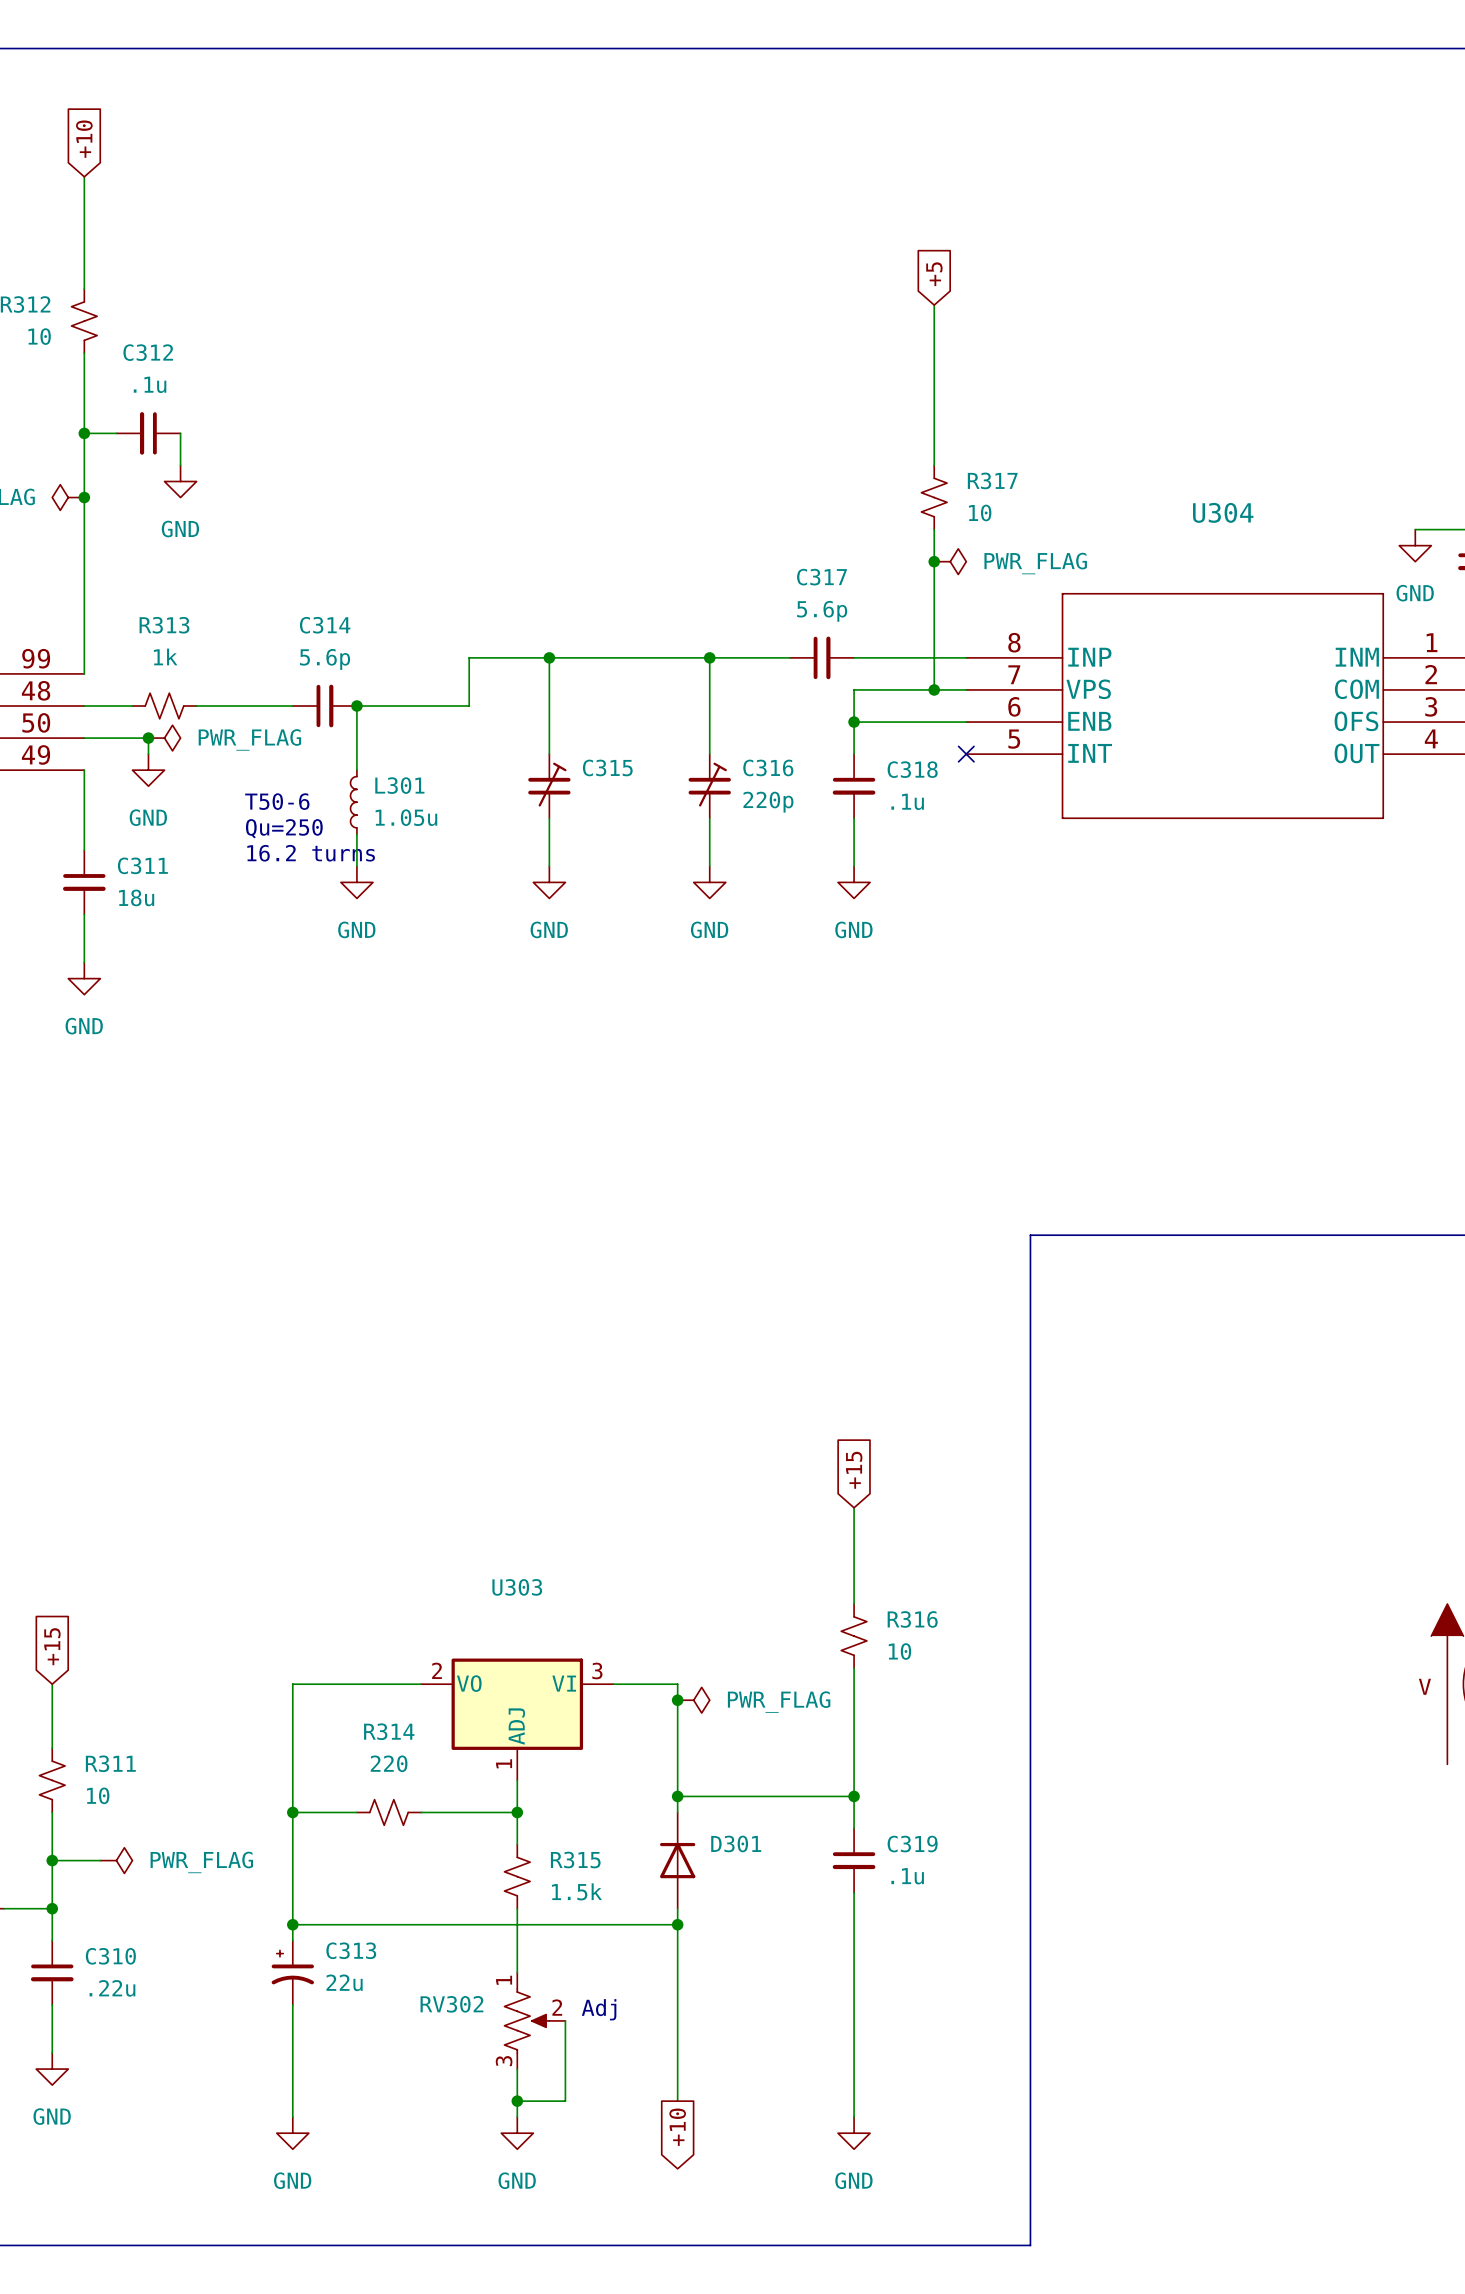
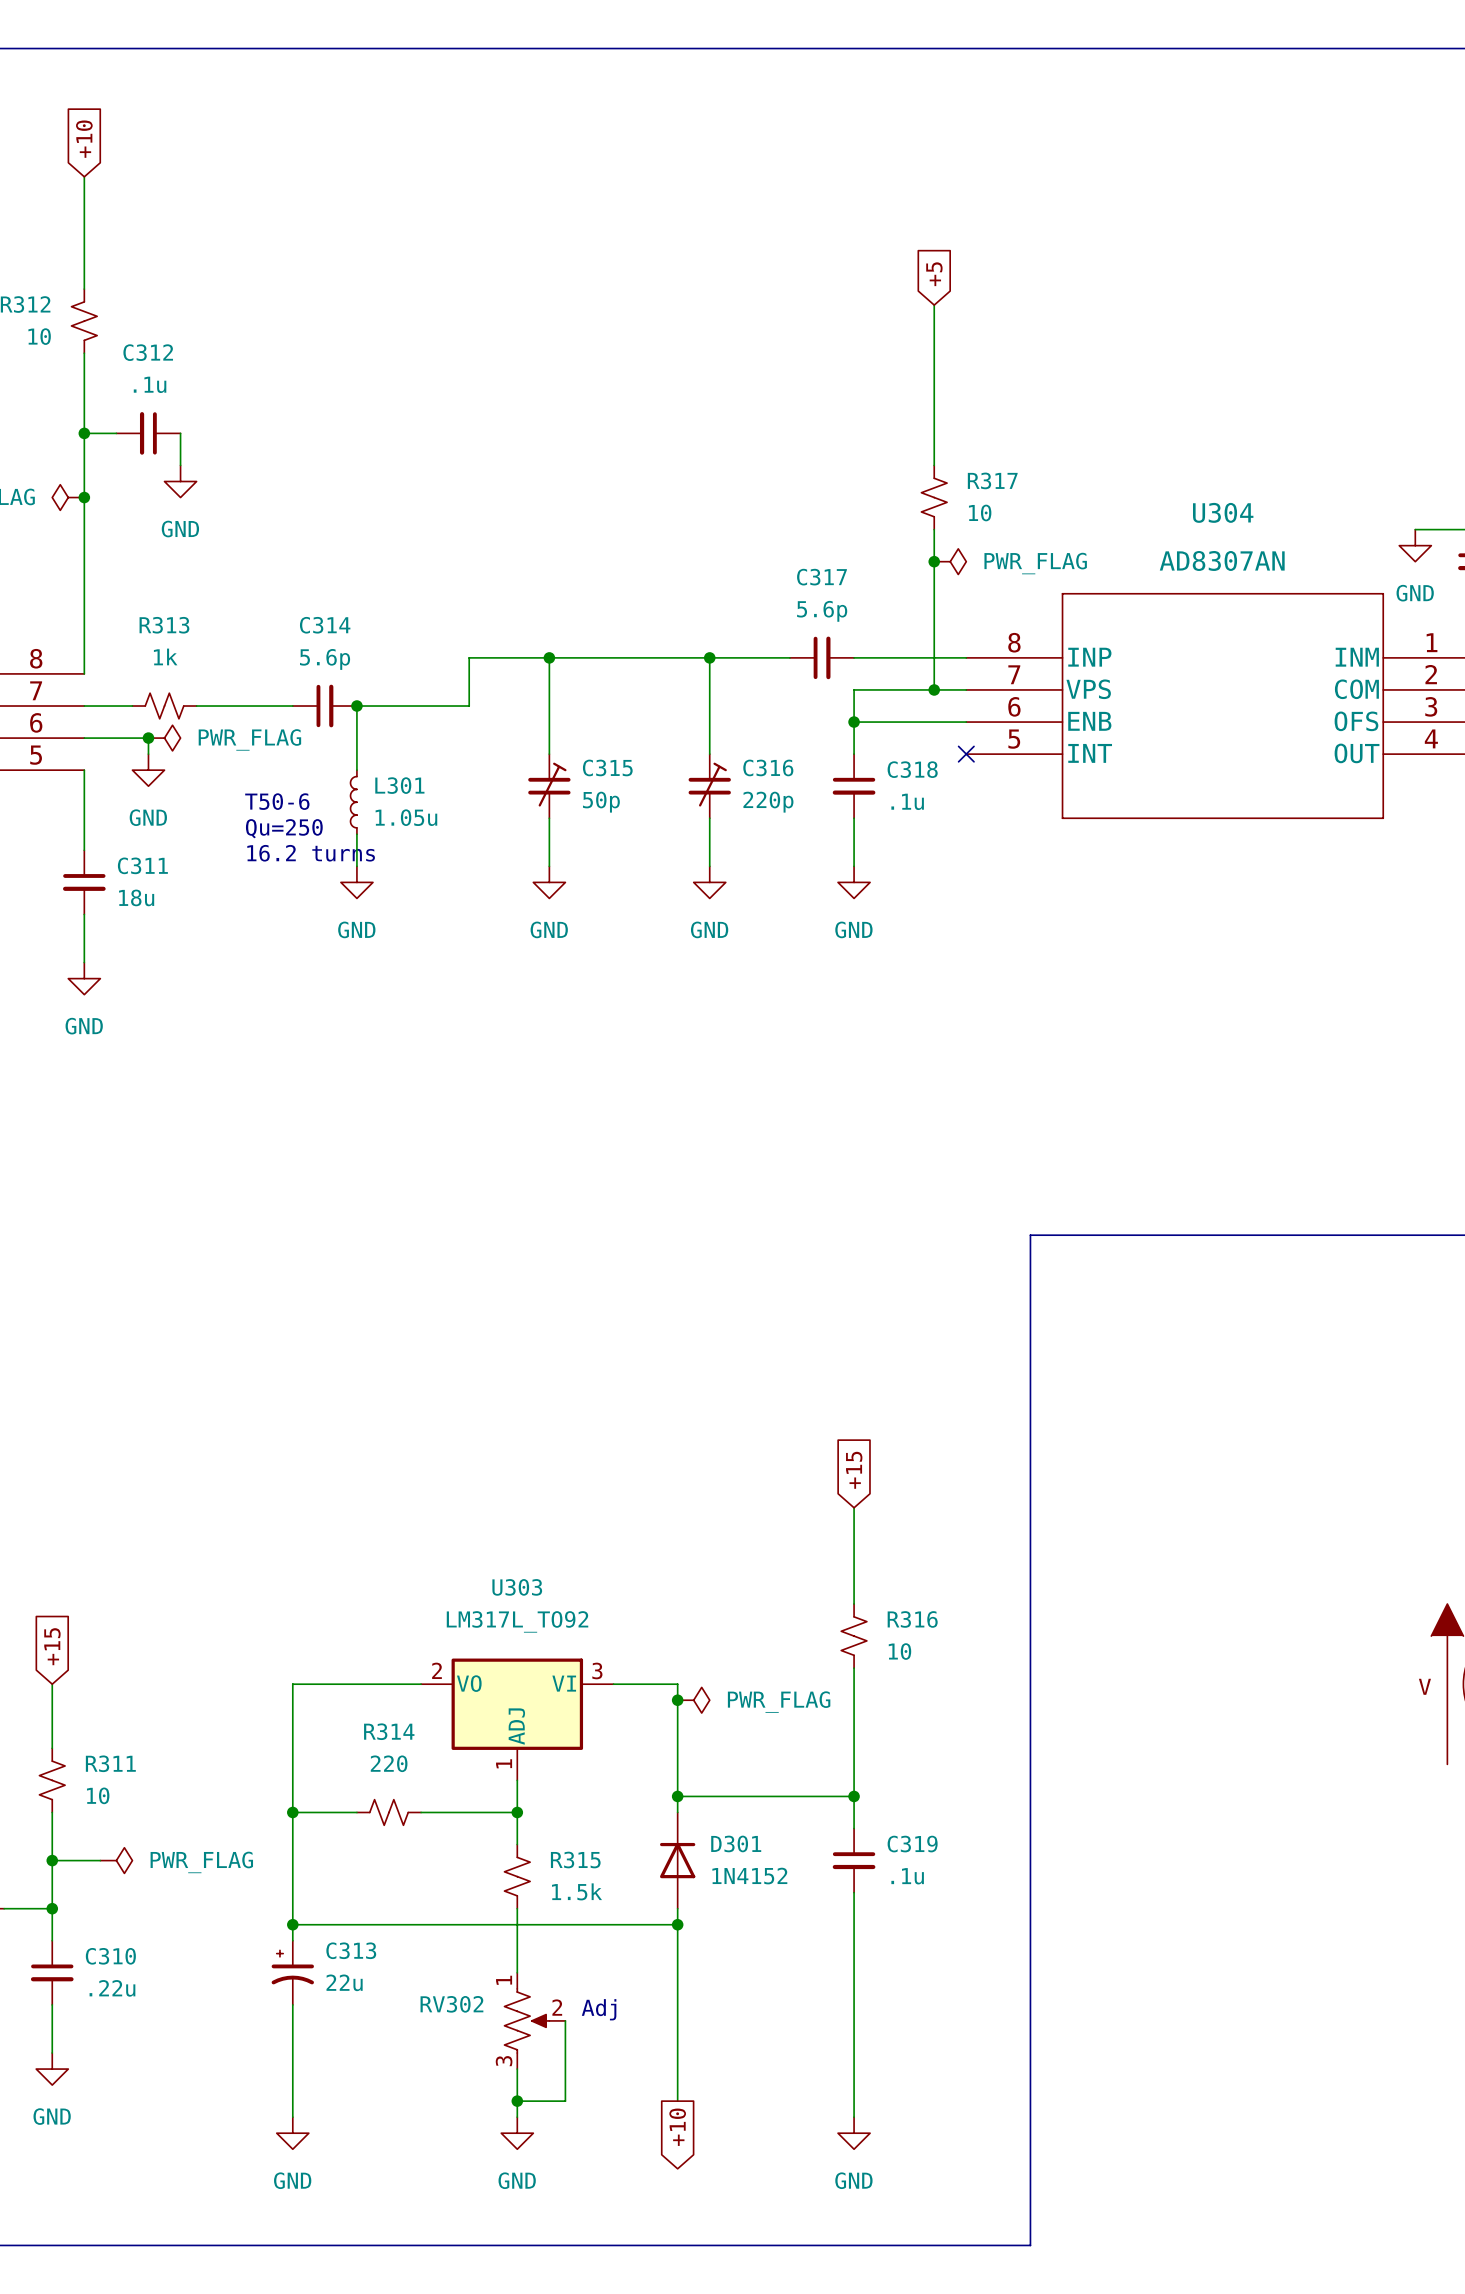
U304 value: none -> AD8307AN (1222, 560)
part pin number: 99 (36, 658) -> 8 (36, 658)
part pin number: 48 (36, 690) -> 7 (36, 690)
part pin number: 50 (36, 722) -> 6 (36, 722)
part pin number: 49 (35, 754) -> 5 (36, 755)
C315 value: none -> 50p (601, 802)
U303 value: none -> LM317L_TO92 (517, 1621)
D301 value: none -> 1N4152 (749, 1876)

